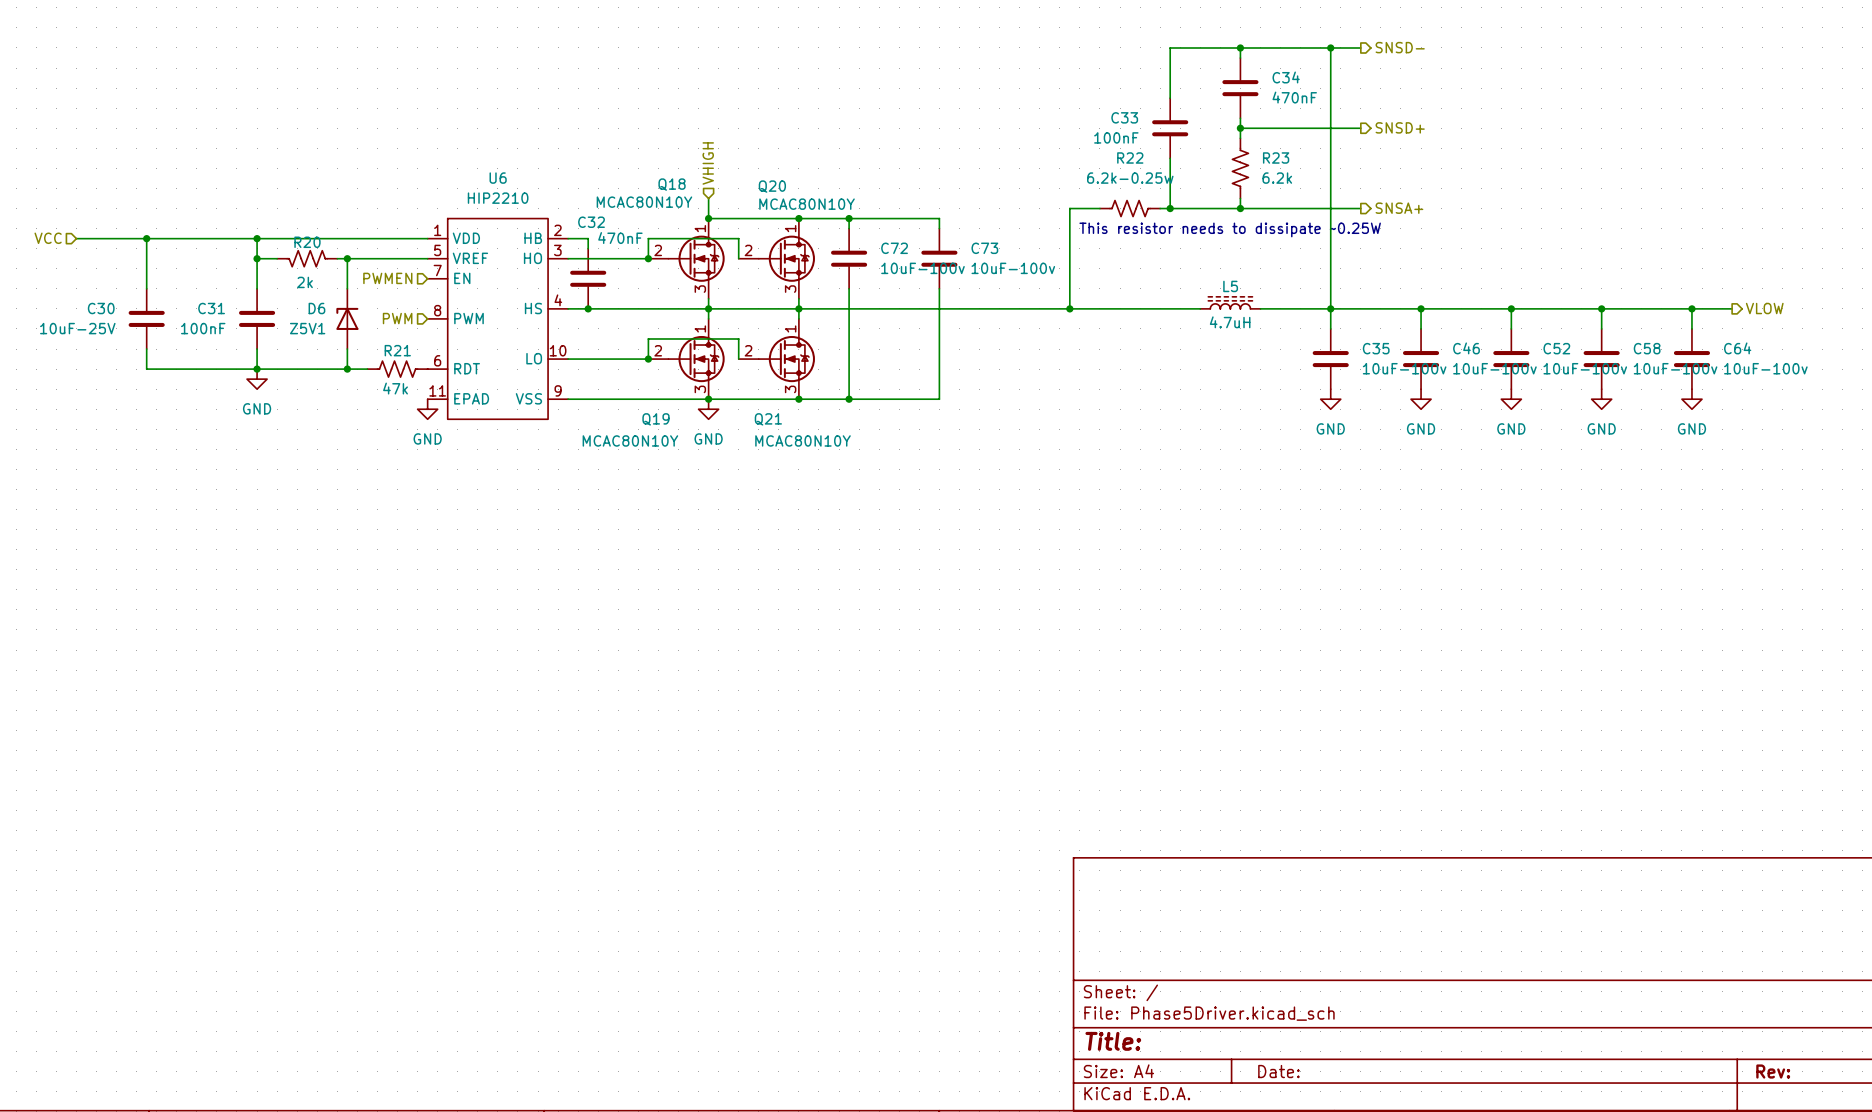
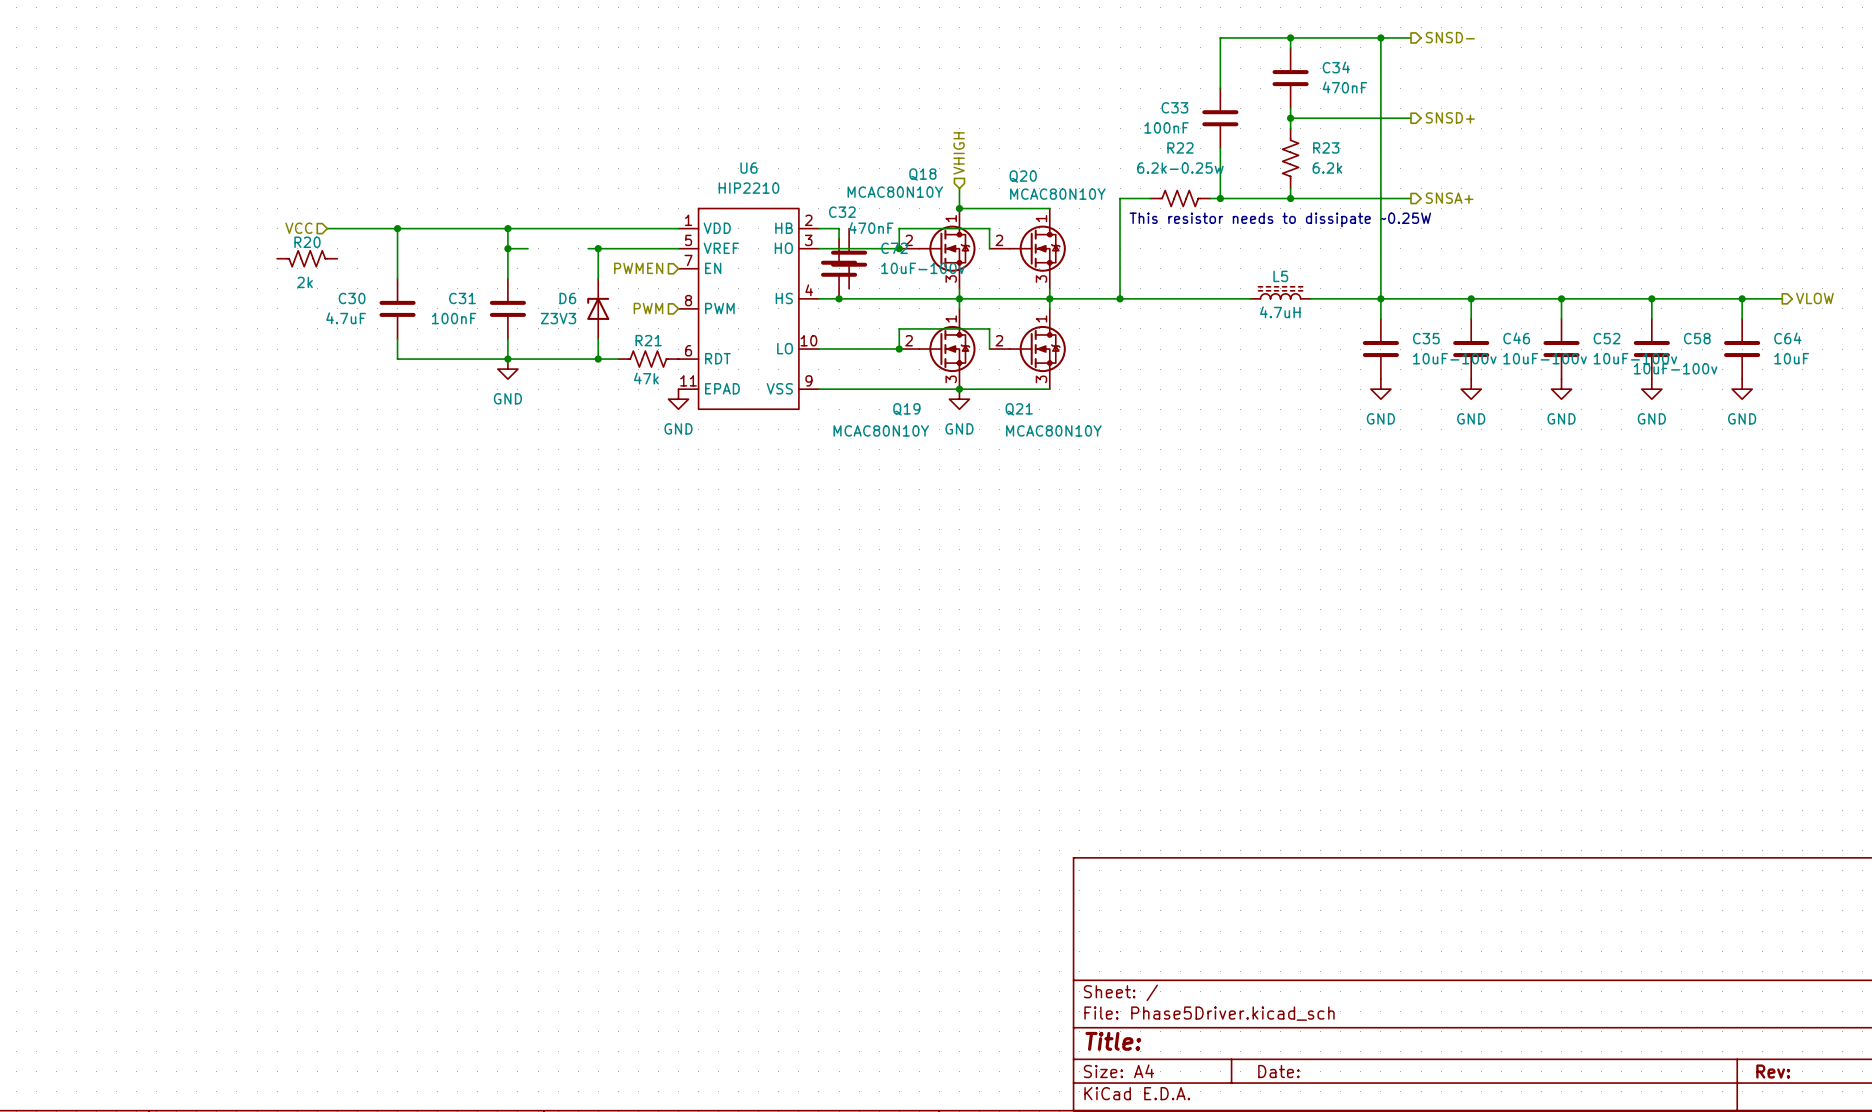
junction: none -> (1290, 37)
junction: none -> (1380, 37)
wire: (1240, 47) (1240, 58) -> (1290, 37) (1290, 47)
junction: (1240, 47) -> none
wire: (1330, 47) (1330, 328) -> (1380, 37) (1380, 318)
junction: (1330, 47) -> none
wire: (1360, 47) (1170, 47) (1170, 98) -> (1411, 37) (1220, 37) (1220, 88)
hierarchical label position: SNSD- (1400, 47) -> SNSD- (1450, 37)
C34 position: (1240, 88) -> (1290, 78)
wire: (1240, 118) (1240, 138) -> (1290, 108) (1290, 128)
junction: none -> (1290, 118)
hierarchical label position: SNSD+ (1400, 127) -> SNSD+ (1450, 117)
C33 position: (1170, 128) -> (1220, 118)
wire: (1240, 128) (1360, 128) -> (1290, 118) (1411, 118)
junction: (1240, 128) -> none
hierarchical label: none -> VHIGH (959, 153)
wire: (1170, 158) (1170, 208) -> (1220, 148) (1220, 198)
hierarchical label: VHIGH (708, 163) -> none
R23 position: (1240, 168) -> (1290, 158)
wire: none -> (959, 188) (959, 208) (1049, 208)
wire: (708, 198) (708, 218) (939, 218) (939, 228) -> none
wire: (1240, 198) (1240, 208) -> (1290, 188) (1290, 198)
junction: none -> (1290, 198)
junction: none -> (959, 208)
wire: (1099, 208) (1069, 208) (1069, 308) -> (1150, 198) (1120, 198) (1120, 298)
R22 position: (1130, 208) -> (1180, 198)
wire: (1160, 208) (1360, 208) -> (1210, 198) (1411, 198)
junction: (1170, 208) -> none
junction position: (1240, 208) -> (1220, 198)
hierarchical label position: SNSA+ (1399, 208) -> SNSA+ (1449, 198)
junction: (708, 218) -> none
junction: (798, 218) -> none
wire: (849, 218) (849, 228) -> none
junction: (849, 218) -> none
hierarchical label: none -> VCC (298, 228)
wire: none -> (327, 228) (678, 228)
junction: none -> (397, 228)
wire: none -> (507, 228) (507, 278)
junction: none -> (507, 228)
wire: none -> (818, 228) (839, 228) (839, 238)
text position: This resistor needs to dissipate ~0.25W (1230, 229) -> This resistor needs to dissipate ~0.25W (1280, 219)
hierarchical label: VCC (48, 238) -> none
wire: (76, 238) (427, 238) -> none
wire: (146, 238) (146, 288) -> none
junction: (146, 238) -> none
wire: (257, 238) (257, 288) -> (397, 228) (397, 278)
junction: (257, 238) -> none
wire: (568, 238) (588, 238) (588, 248) -> (678, 248) (588, 248)
wire: none -> (507, 248) (527, 248)
junction: none -> (507, 248)
wire: none -> (598, 248) (598, 278)
junction: none -> (598, 248)
wire: none -> (818, 248) (899, 248) (899, 228) (989, 228) (989, 248)
junction: none -> (899, 248)
wire: (257, 258) (277, 258) -> none
junction: (257, 258) -> none
wire: (337, 258) (427, 258) -> none
wire: (347, 258) (347, 288) -> none
junction: (347, 258) -> none
wire: (568, 258) (648, 258) (648, 238) (738, 238) (738, 258) -> none
junction: (648, 258) -> none
Q18 position: (686, 258) -> (937, 248)
Q20 position: (776, 258) -> (1027, 248)
C73: 10uF-100v (939, 258) -> none
hierarchical label: none -> PWMEN (638, 268)
hierarchical label: PWMEN (387, 278) -> none
C32 position: (588, 278) -> (839, 268)
wire: (849, 288) (849, 399) -> none
wire: (939, 288) (939, 399) (568, 399) -> none
wire: none -> (1049, 288) (1049, 308)
wire: (708, 298) (708, 318) -> (598, 338) (598, 359)
wire: none -> (818, 298) (1250, 298)
junction: none -> (839, 298)
junction: none -> (959, 298)
junction: none -> (1120, 298)
junction: none -> (1380, 298)
junction: none -> (1471, 298)
junction: none -> (1561, 298)
junction: none -> (1651, 298)
junction: none -> (1742, 298)
L5 position: (1230, 302) -> (1280, 292)
wire: (568, 308) (1200, 308) -> none
junction: (588, 308) -> none
hierarchical label: none -> PWM (648, 308)
junction: (708, 308) -> none
junction: (798, 308) -> none
junction position: (1069, 308) -> (1049, 298)
wire: (1260, 308) (1732, 308) -> (1310, 298) (1782, 298)
junction: (1330, 308) -> none
wire: (1421, 308) (1421, 328) -> (1471, 298) (1471, 318)
junction: (1421, 308) -> none
wire: (1511, 308) (1511, 328) -> (1561, 298) (1561, 318)
junction: (1511, 308) -> none
wire: (1601, 308) (1601, 328) -> (1651, 298) (1651, 318)
junction: (1601, 308) -> none
wire: (1691, 308) (1691, 328) -> (1742, 298) (1742, 318)
junction: (1691, 308) -> none
hierarchical label position: VLOW (1764, 308) -> VLOW (1814, 298)
C30 position: (146, 318) -> (397, 308)
C31 position: (257, 318) -> (507, 308)
D6 position: (347, 318) -> (598, 308)
hierarchical label: PWM (397, 318) -> none
U6 position: (497, 318) -> (748, 308)
C30 value: 10uF-25V (77, 328) -> 4.7uF (346, 318)
D6 value: Z5V1 (307, 328) -> Z3V3 (558, 318)
wire: none -> (397, 338) (397, 359) (568, 359)
wire: (146, 349) (146, 369) (367, 369) -> none
wire: (257, 349) (257, 369) -> none
wire: (347, 349) (347, 369) -> (507, 338) (507, 359)
wire: none -> (818, 349) (899, 349) (899, 328) (989, 328) (989, 349)
junction: none -> (899, 349)
junction: none -> (507, 359)
junction: none -> (598, 359)
wire: (618, 359) (648, 359) (648, 338) (738, 338) (738, 359) -> none
junction: (648, 359) -> none
Q19 position: (686, 359) -> (937, 349)
Q21 position: (776, 359) -> (1027, 349)
C35 position: (1330, 359) -> (1380, 349)
C46 position: (1421, 359) -> (1471, 349)
C52 position: (1511, 359) -> (1561, 349)
C58 position: (1601, 359) -> (1651, 349)
C64 position: (1691, 359) -> (1742, 349)
C64 value: 10uF-100v (1765, 368) -> 10uF (1791, 358)
junction: (257, 369) -> none
junction: (347, 369) -> none
R21 position: (397, 369) -> (648, 359)
power symbol: GND (257, 379) -> none
wire: none -> (818, 389) (1049, 389)
junction: none -> (959, 389)
power symbol: none -> GND (1380, 389)
power symbol: none -> GND (1471, 389)
power symbol: none -> GND (1561, 389)
power symbol: none -> GND (1651, 389)
power symbol: none -> GND (1742, 389)
junction: (708, 399) -> none
junction: (798, 399) -> none
junction: (849, 399) -> none
power symbol: none -> GND (959, 399)
power symbol: GND (1330, 399) -> none
power symbol: GND (1421, 399) -> none
power symbol: GND (1511, 399) -> none
power symbol: GND (1601, 399) -> none
power symbol: GND (1691, 399) -> none
power symbol position: GND (427, 409) -> GND (507, 369)
power symbol position: GND (708, 409) -> GND (678, 399)

